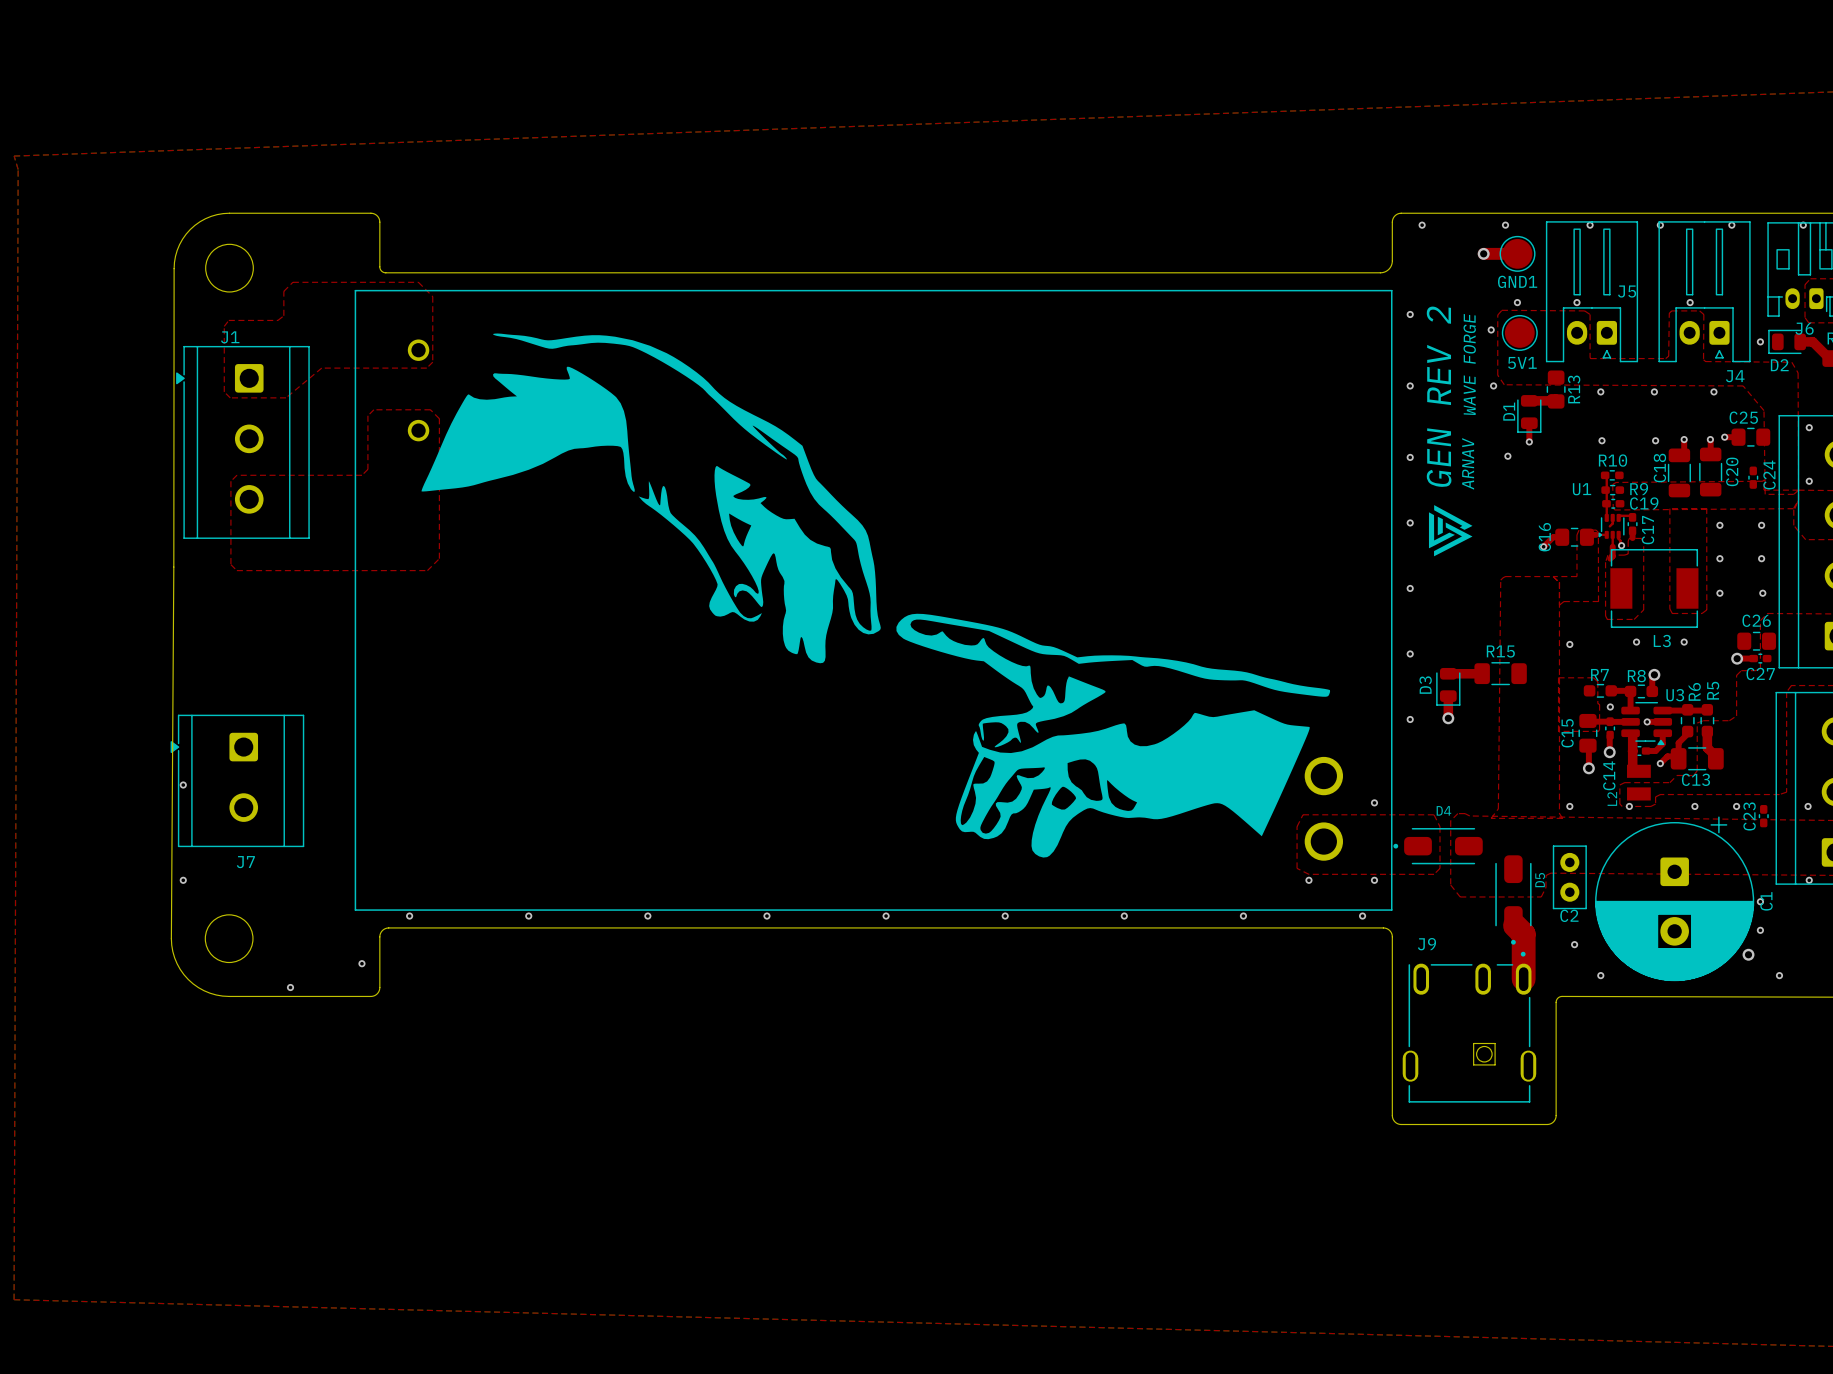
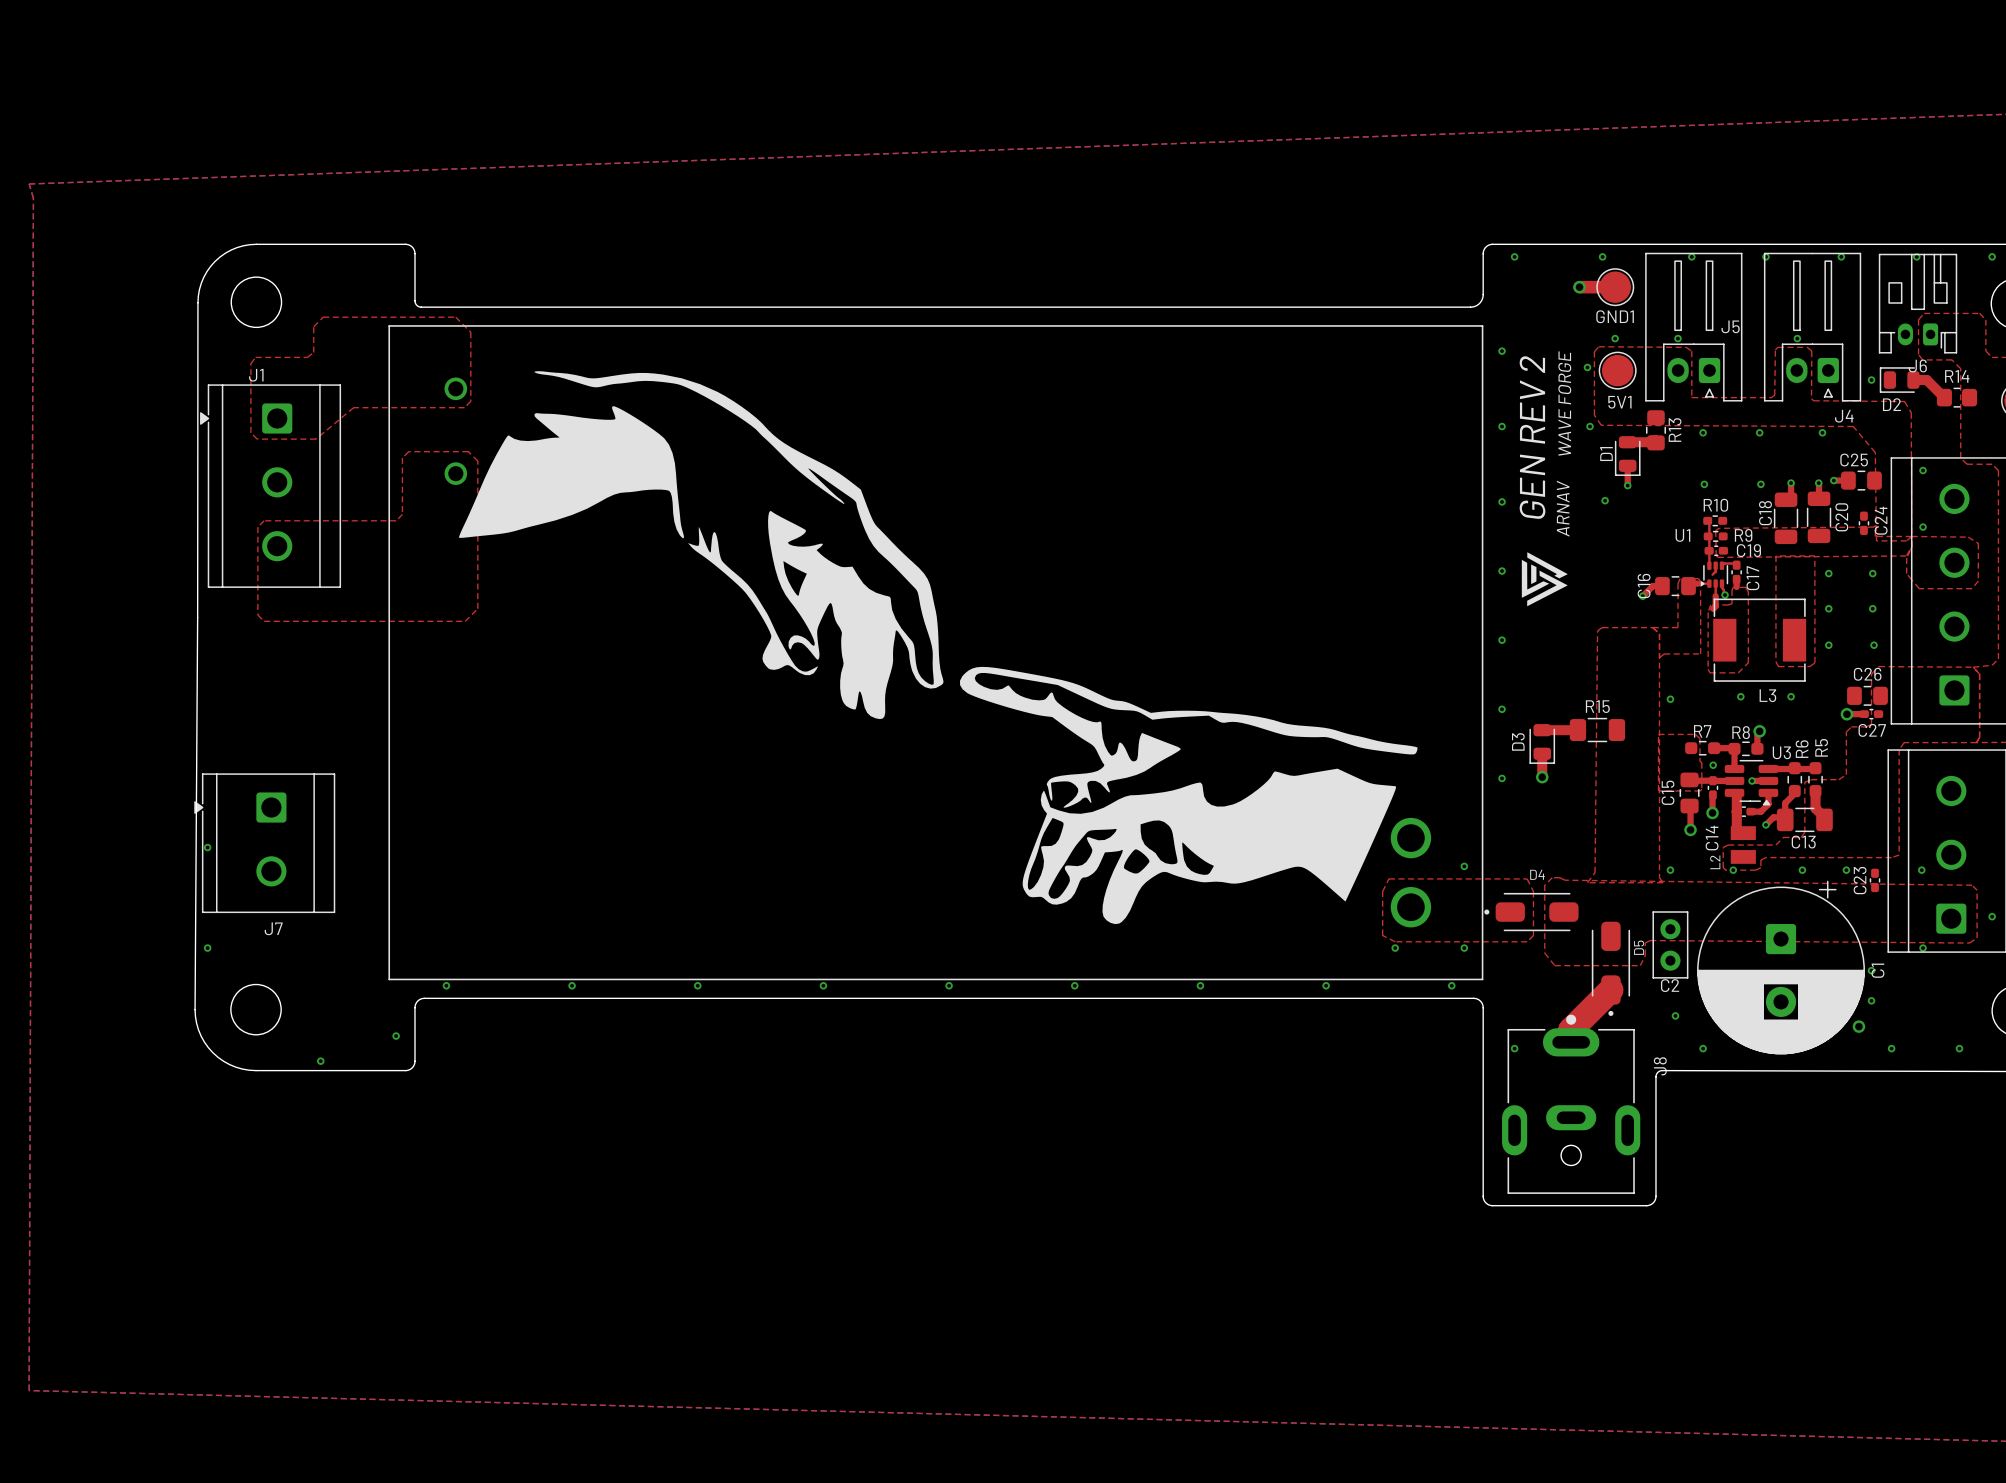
top track: none -> (1610, 989) (1570, 1030) (1570, 1041)
top track: (1515, 925) (1523, 934) (1523, 979) -> none
J9: (1469, 1027) -> none
J8: none -> (1571, 1104)

